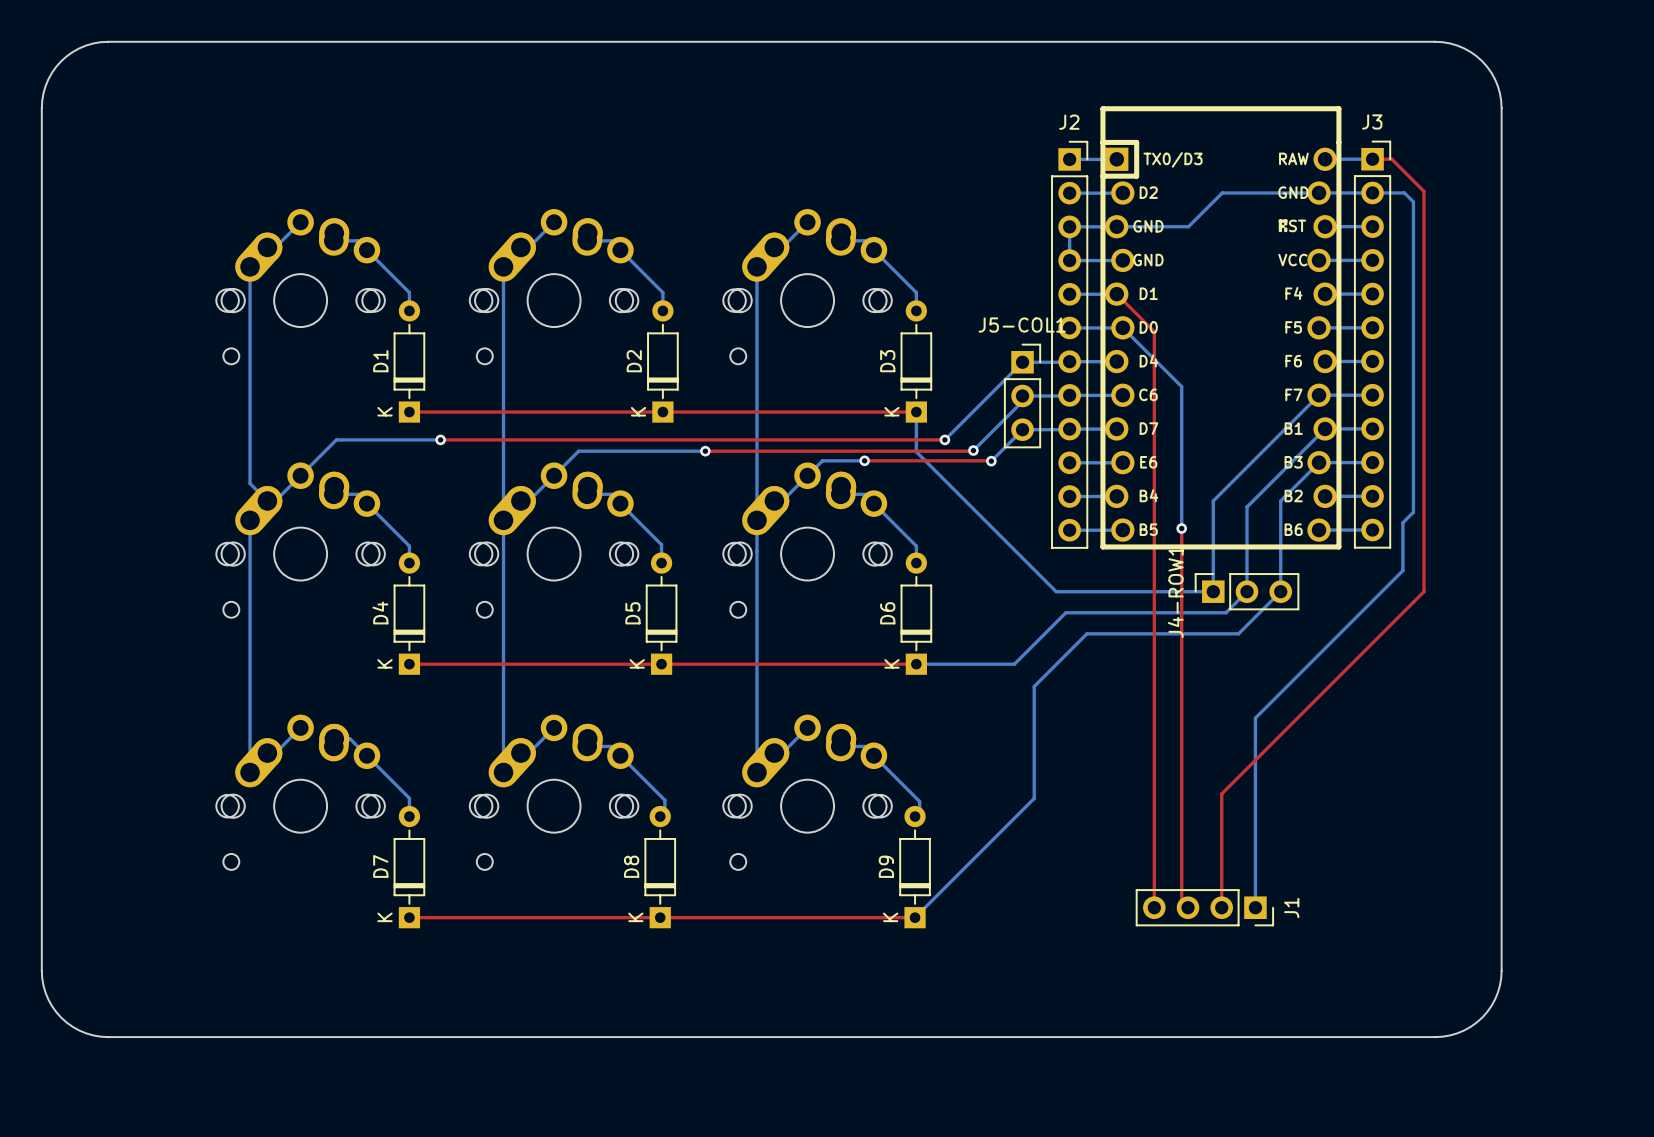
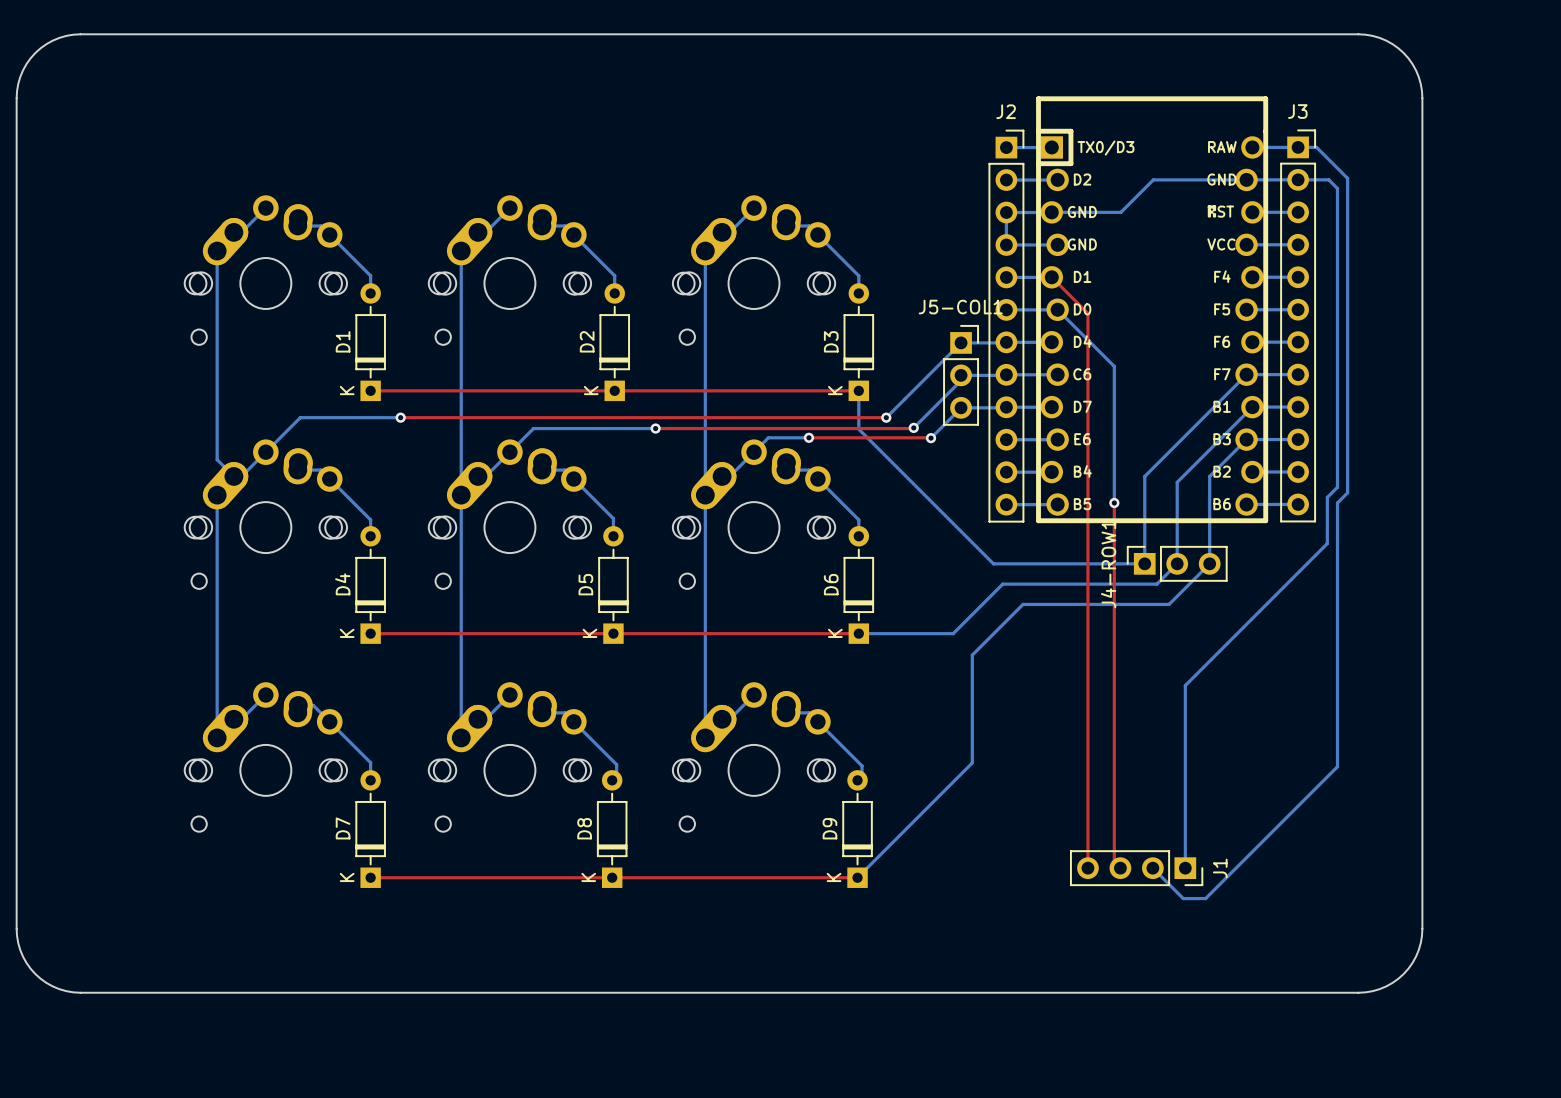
bottom track: none -> (1298, 147) (1316, 147) (1347, 178) (1347, 492) (1337, 502) (1337, 766) (1205, 898) (1183, 898) (1152, 868)
top track: (1372, 159) (1391, 159) (1423, 191) (1423, 591) (1221, 793) (1221, 907) -> none

